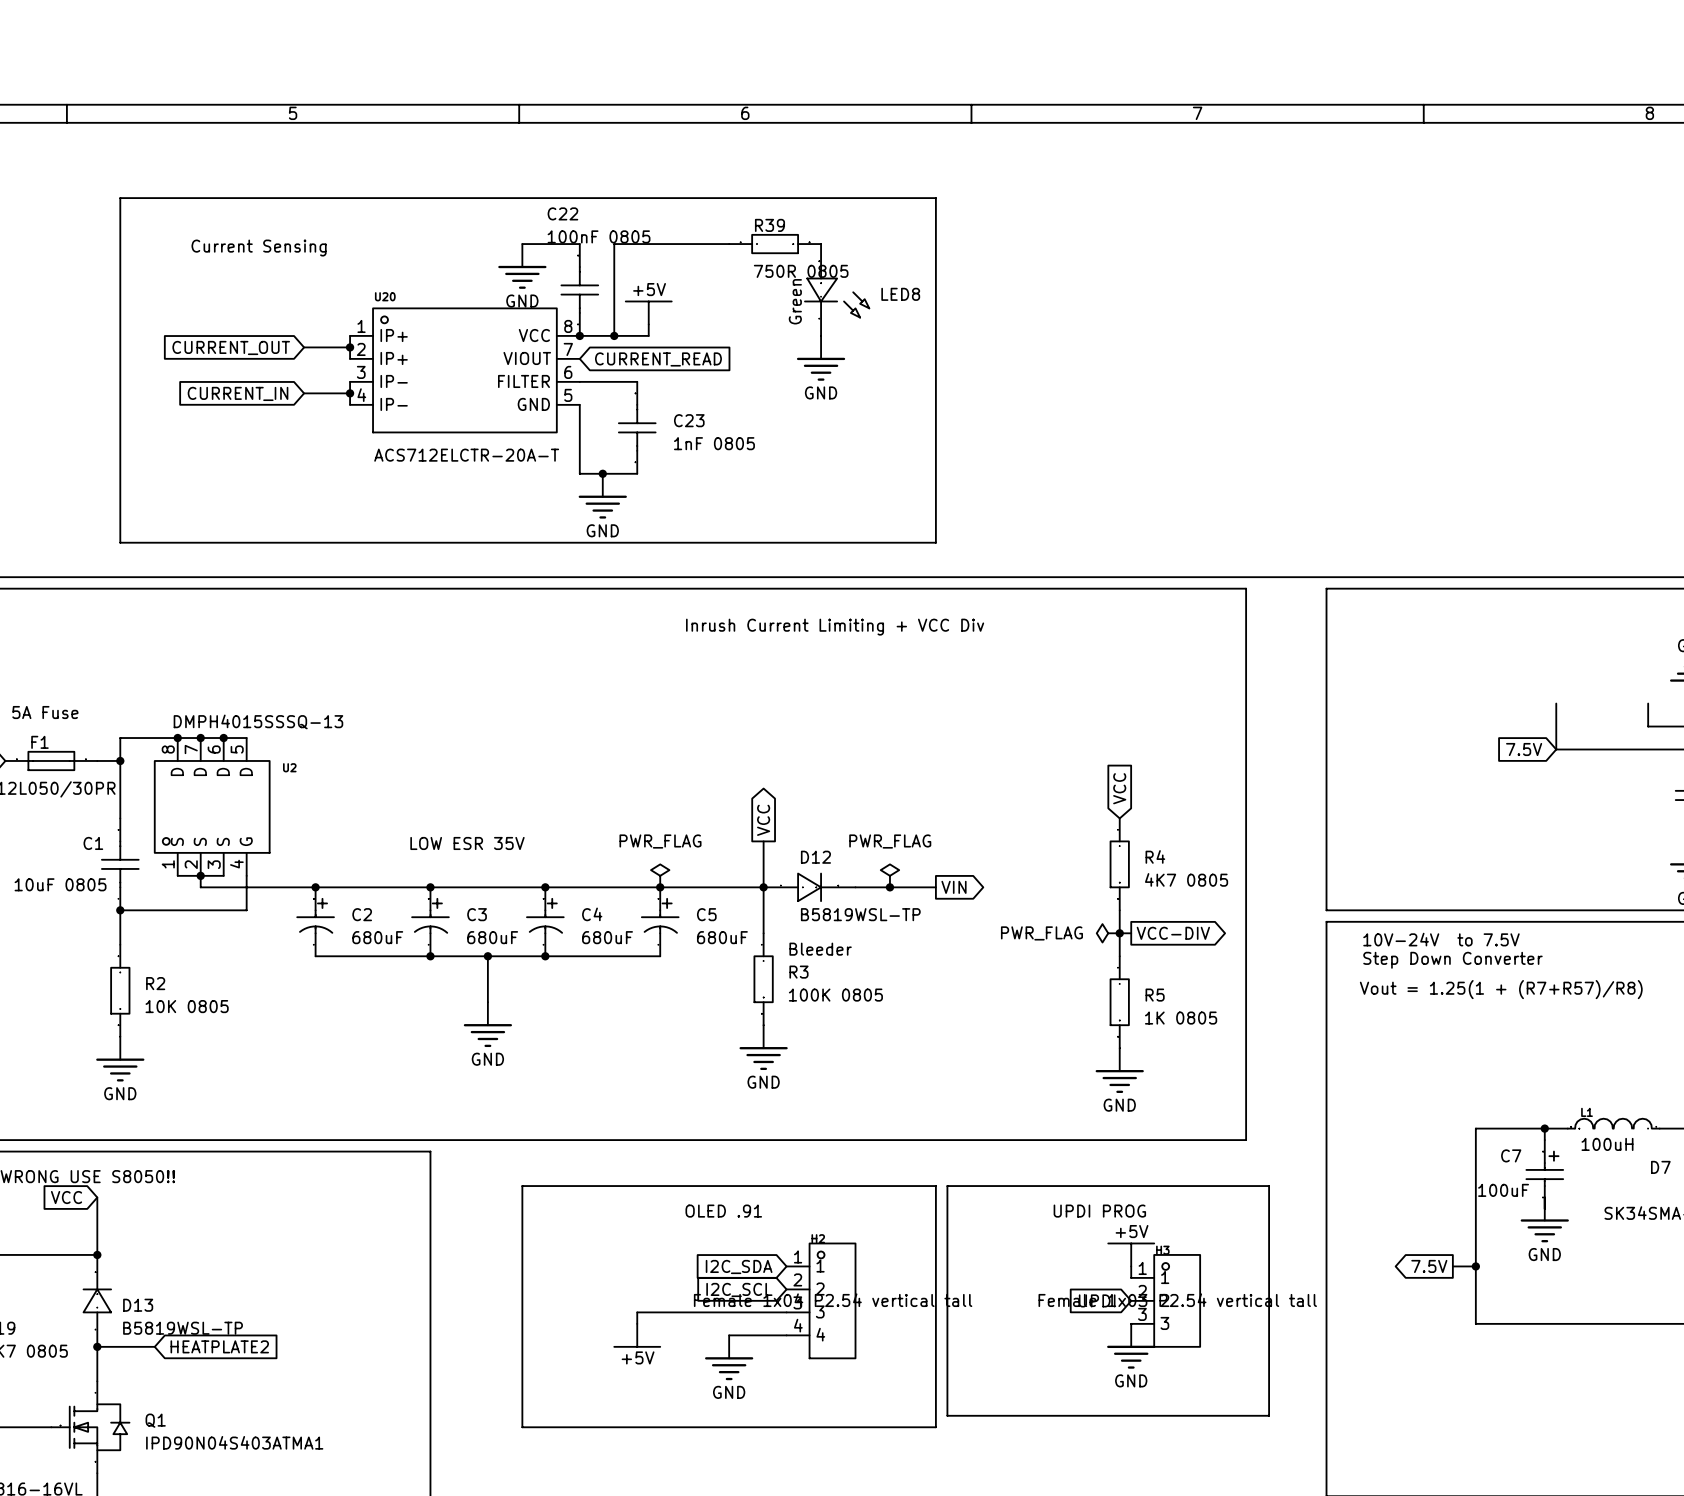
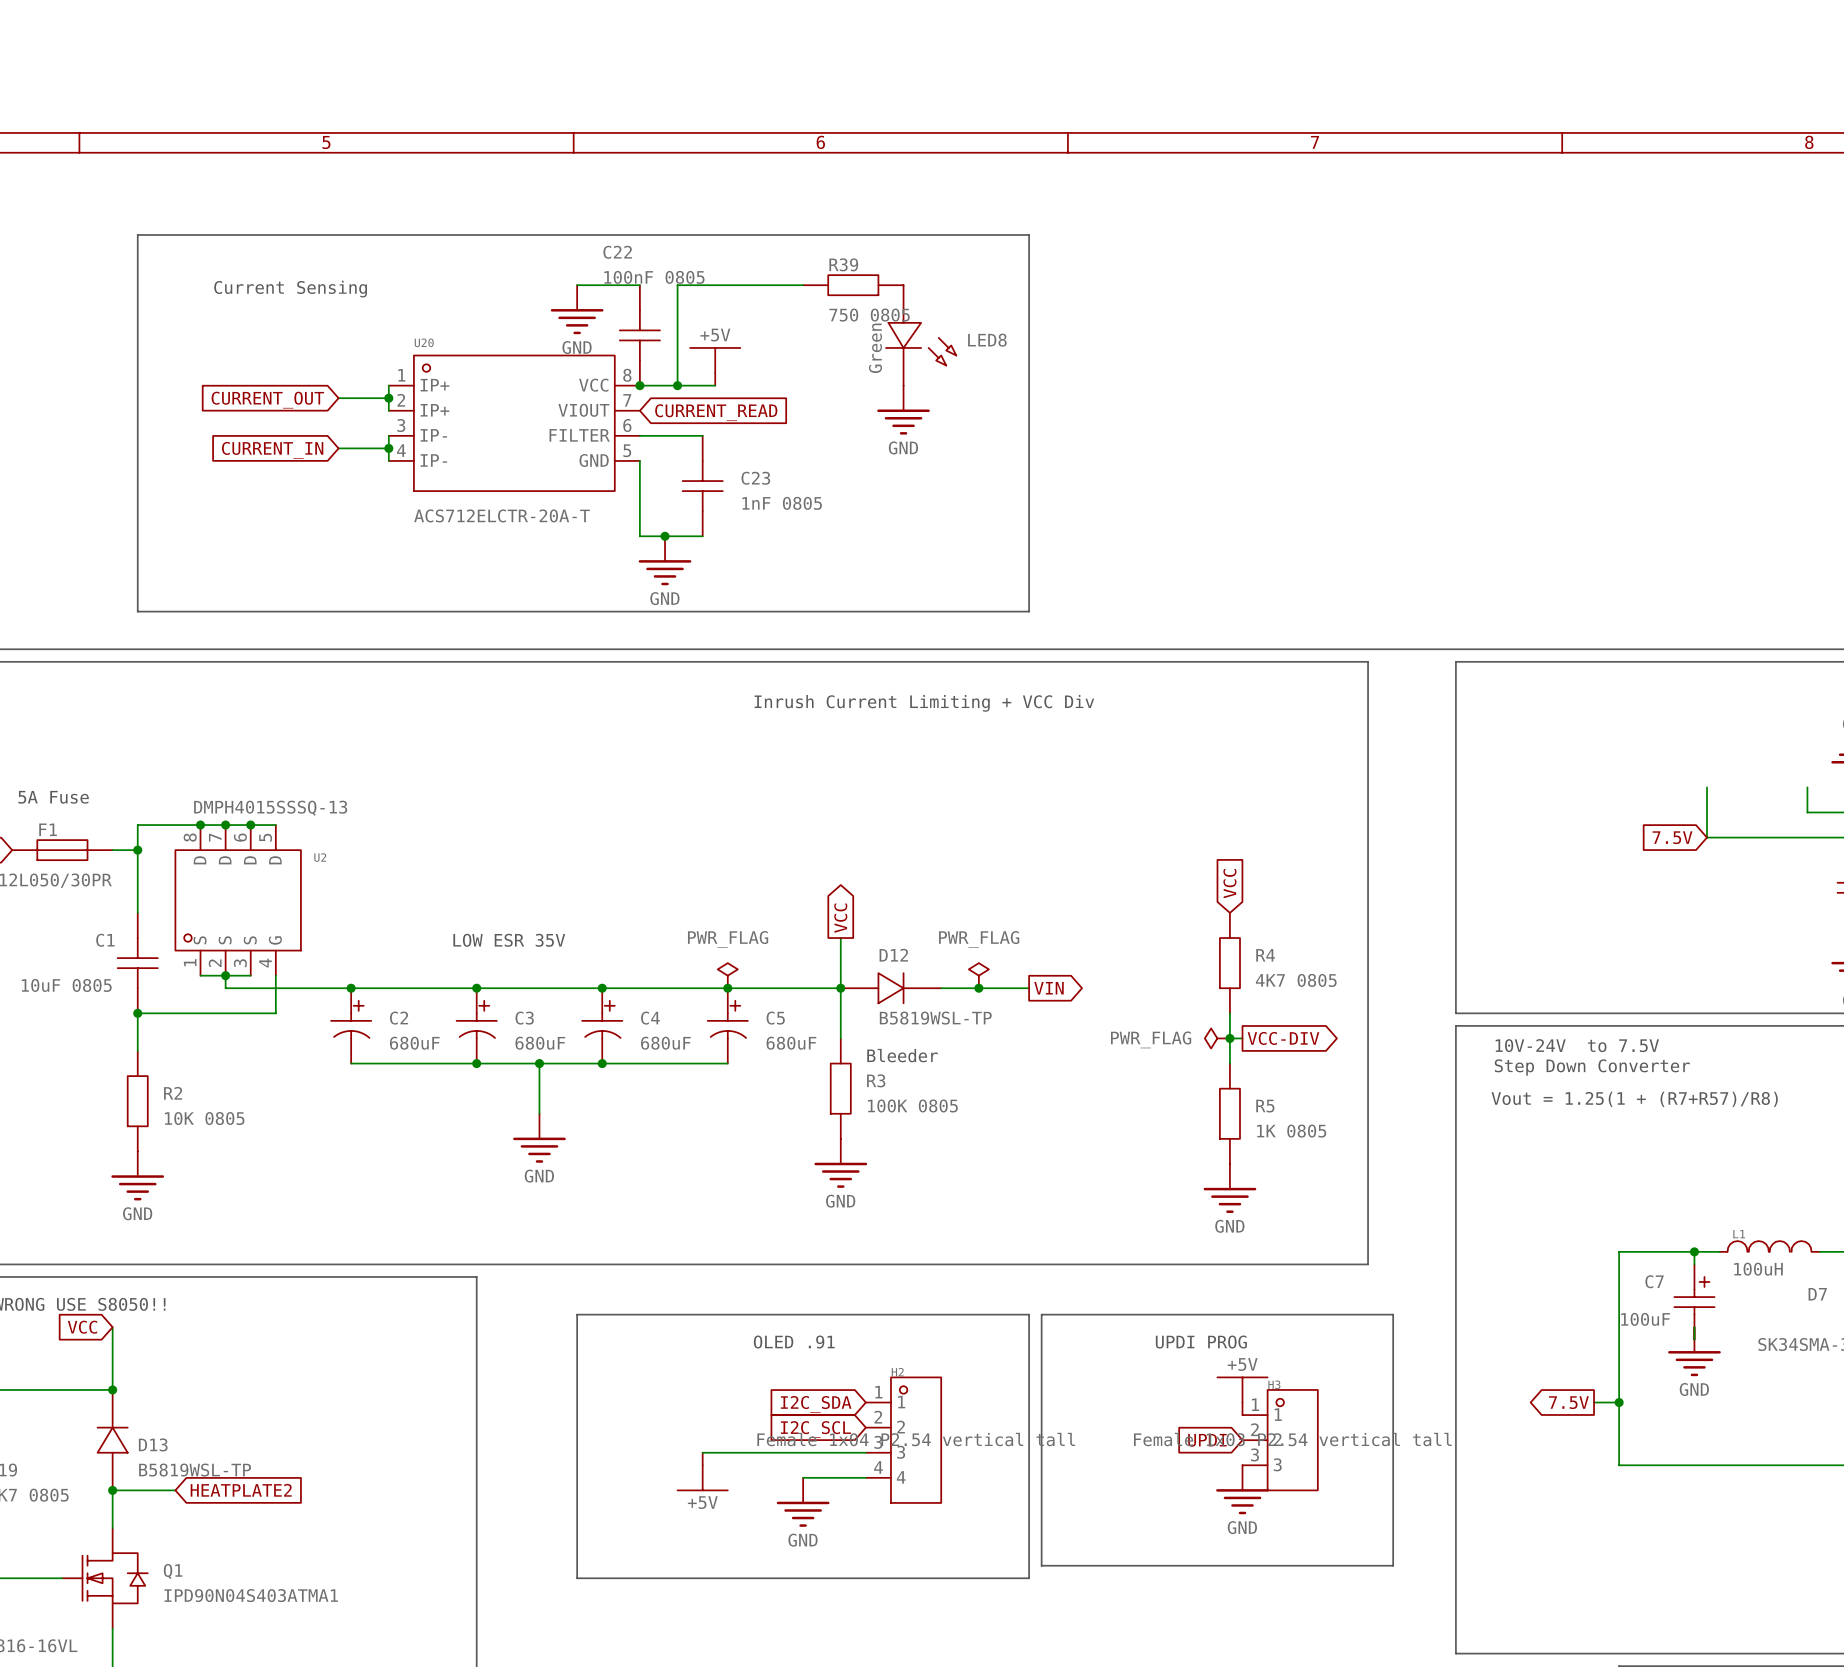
R39 value: 750R 0805 (801, 271) -> 750 0805 (869, 315)

